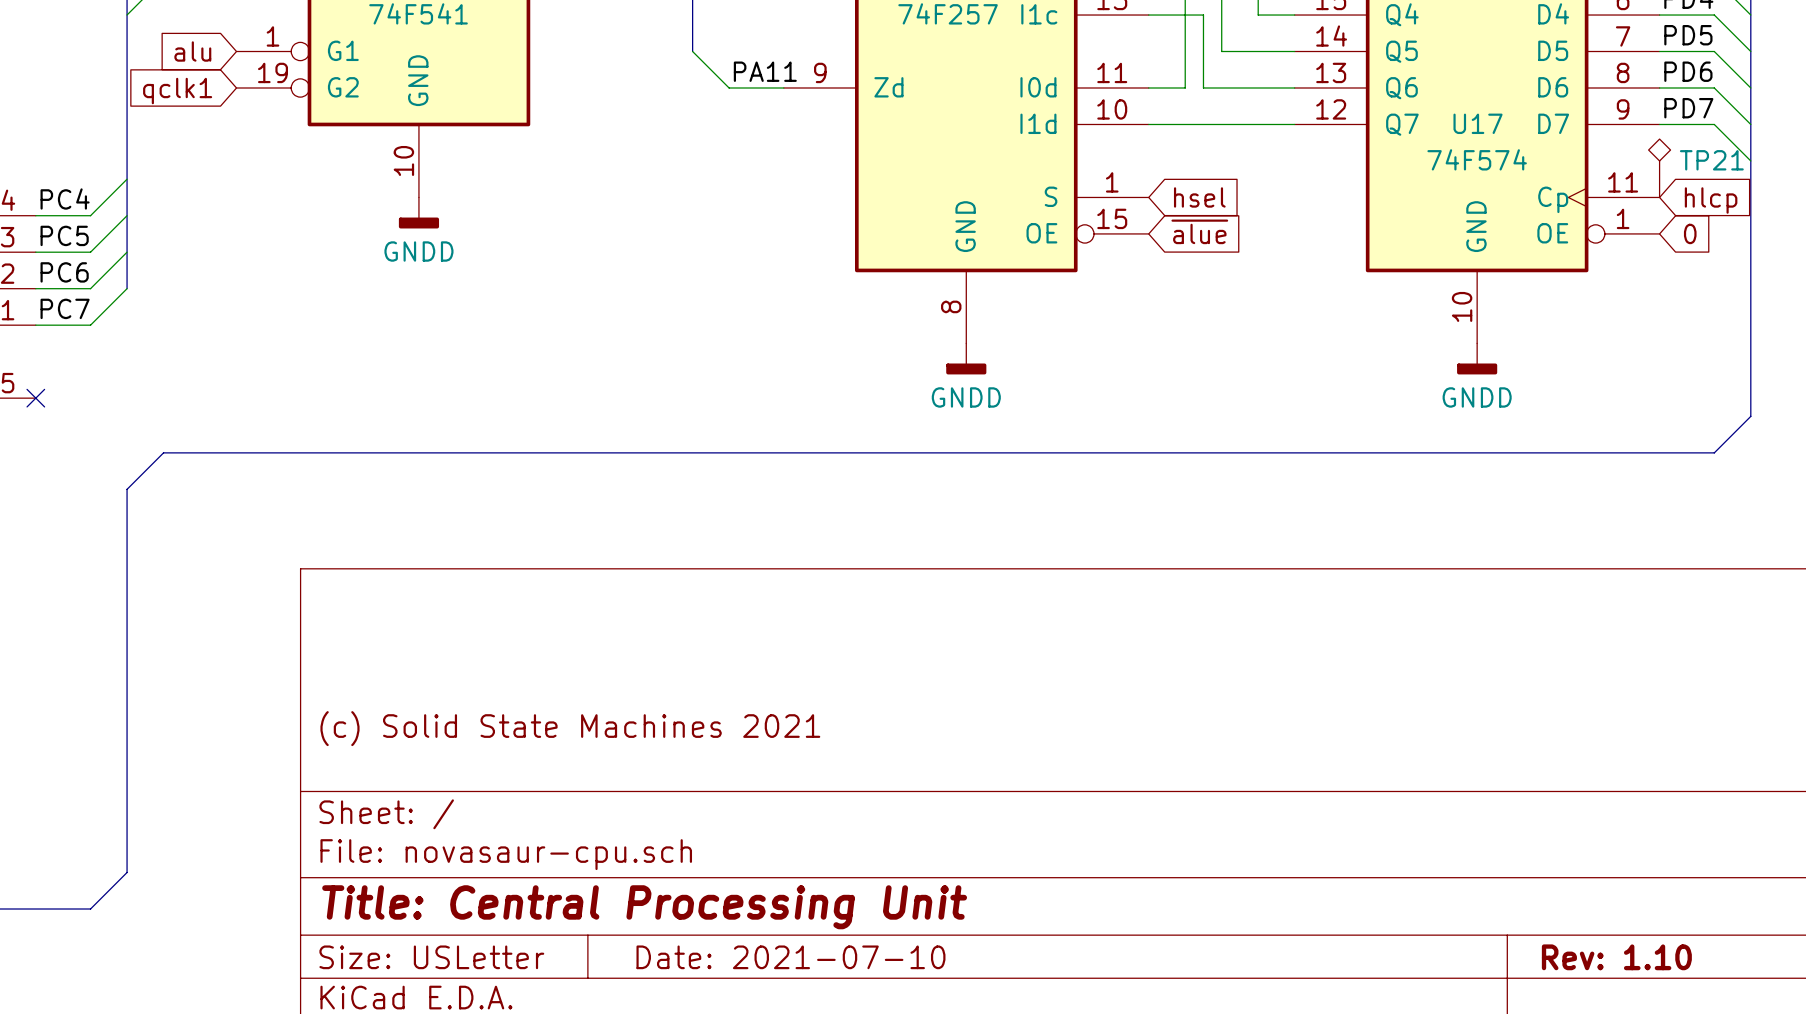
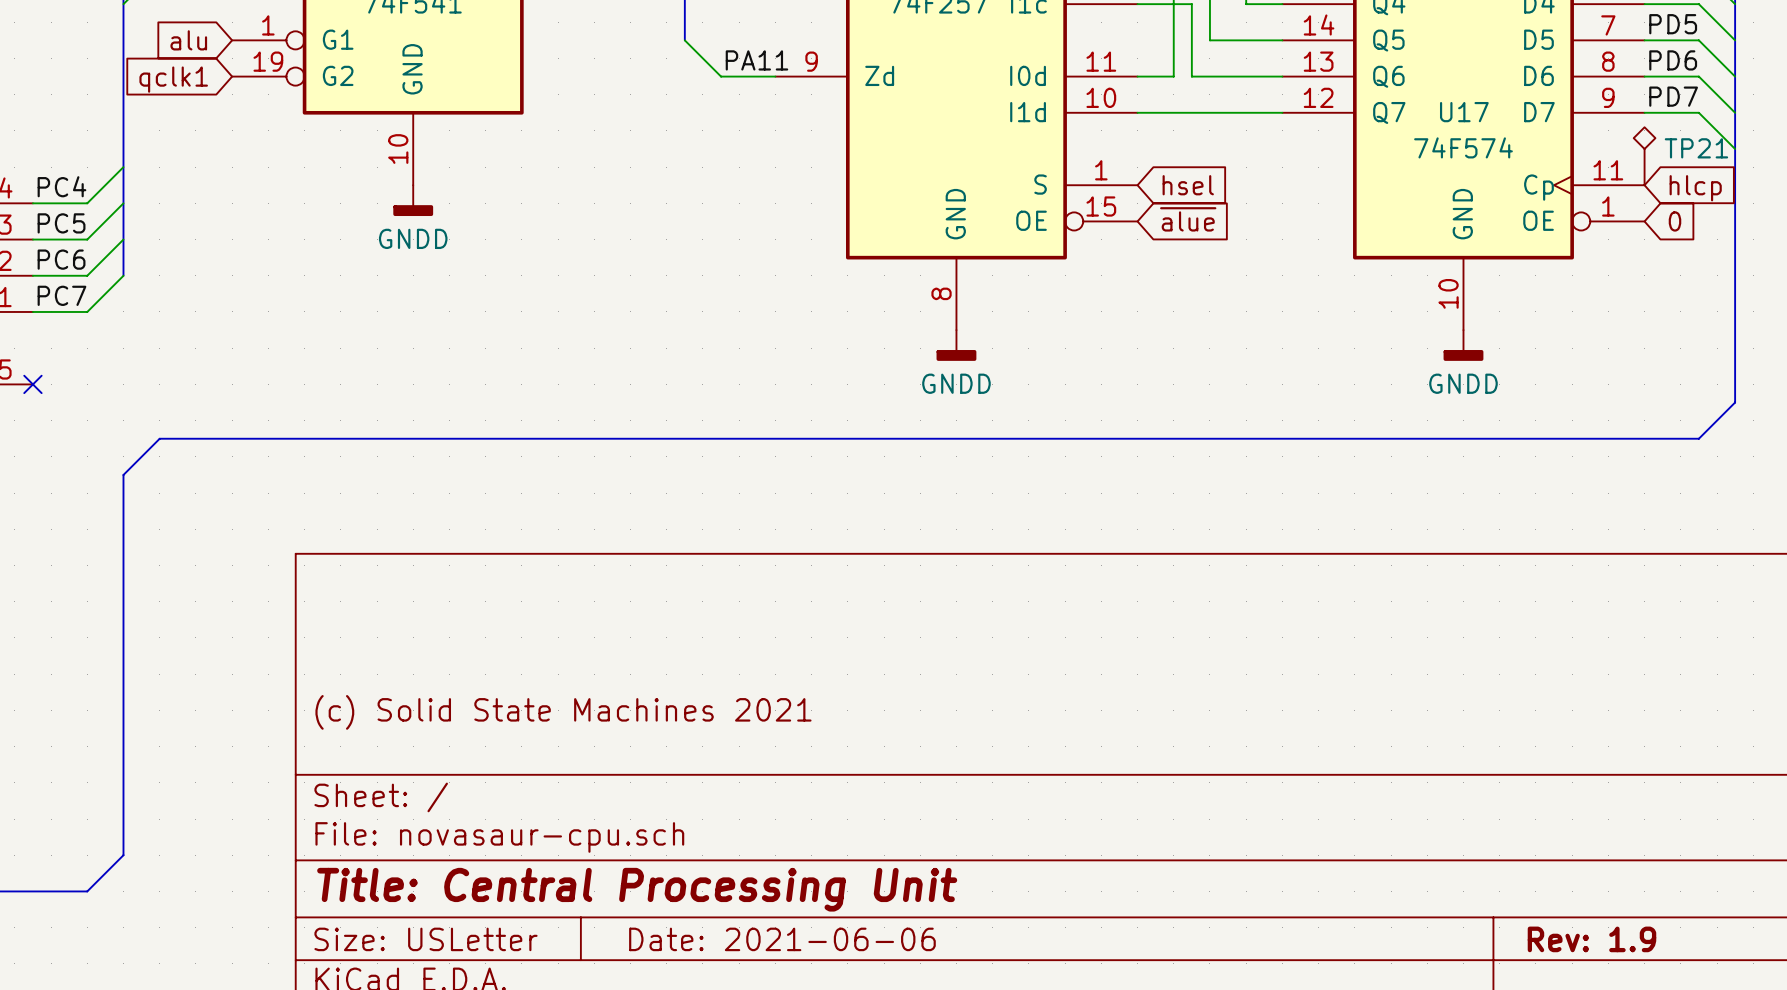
title block: Date: 2021-07-10 (790, 957) -> Date: 2021-06-06 (782, 939)
title block: Rev: 1.10 (1616, 957) -> Rev: 1.9 (1591, 939)

